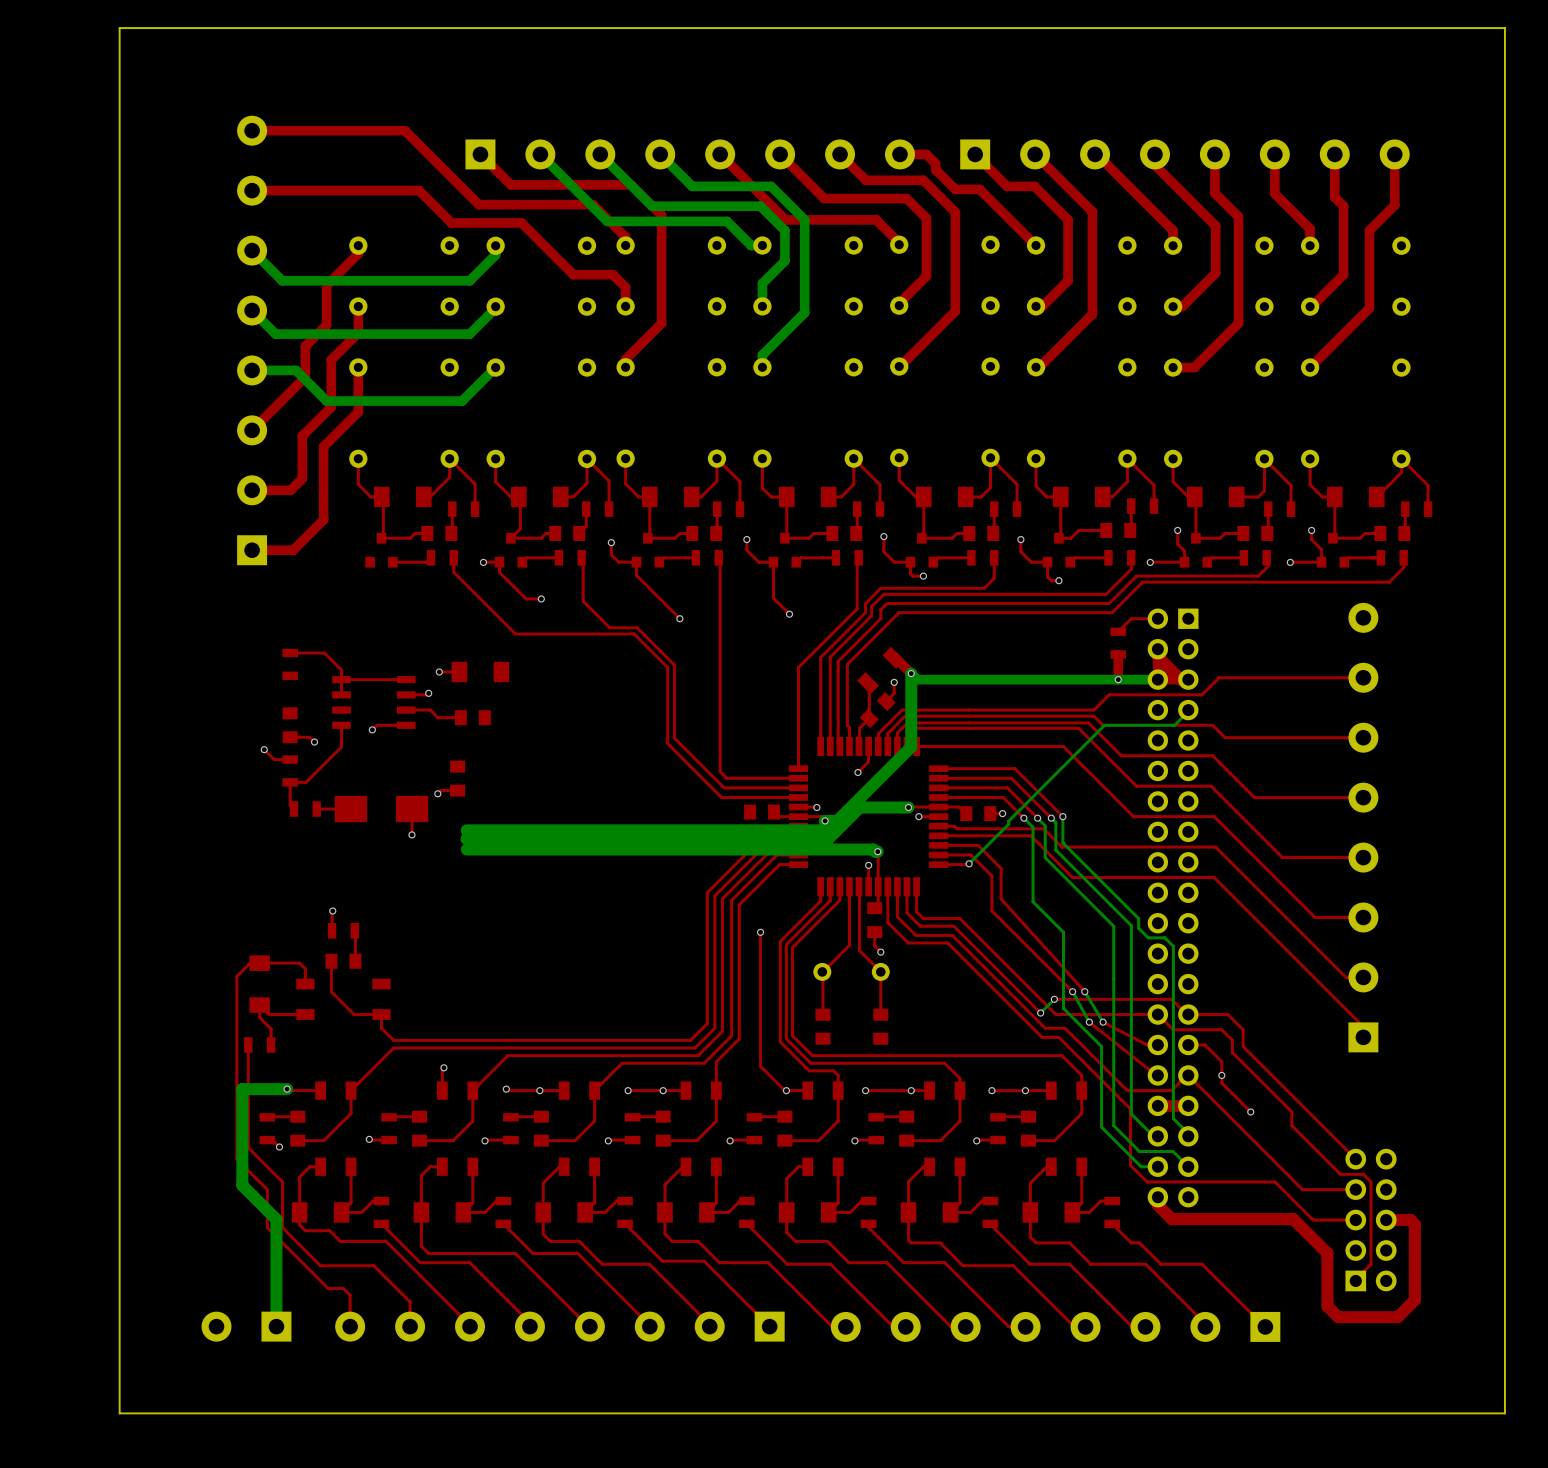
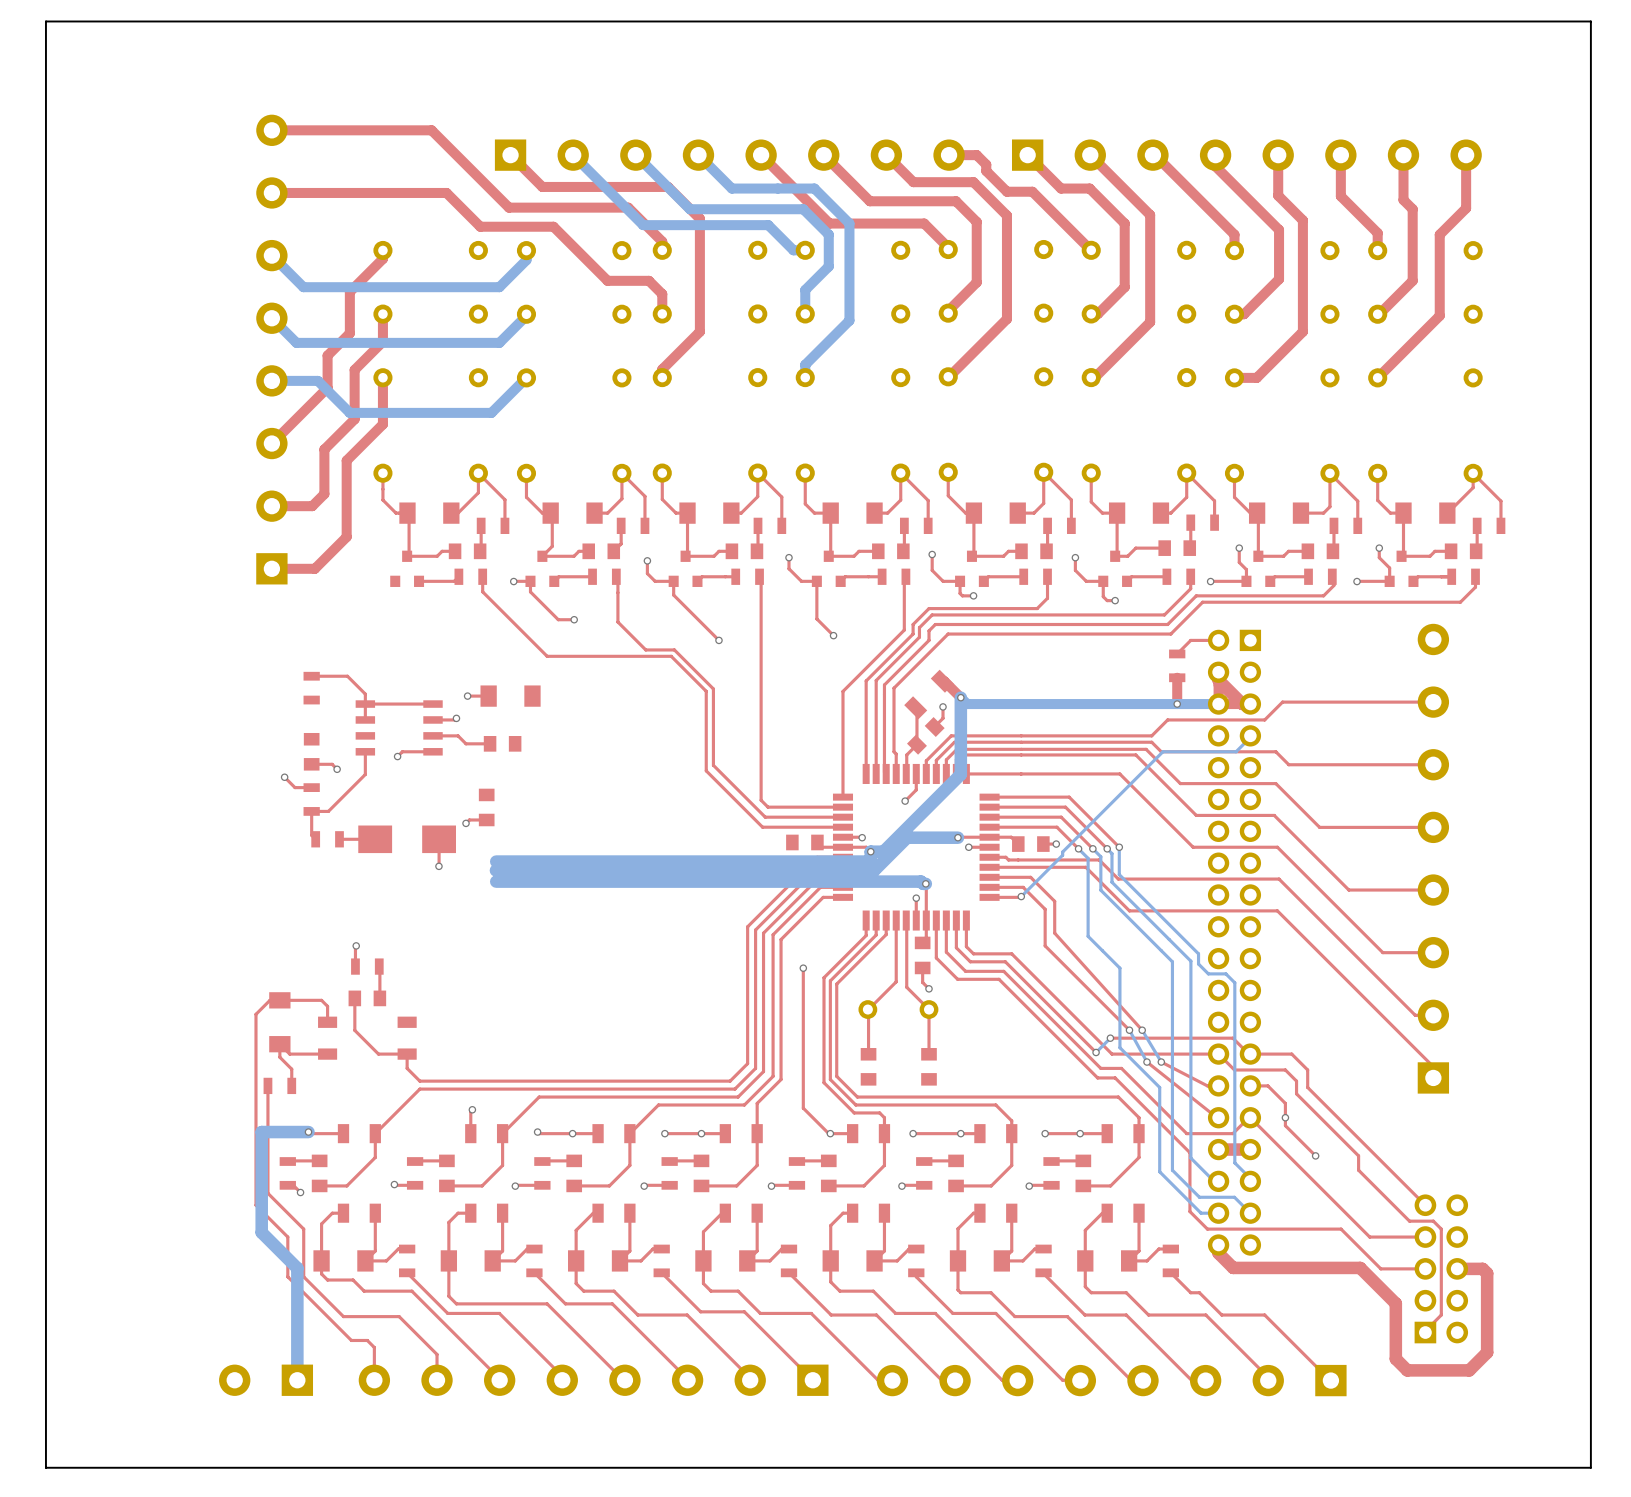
board edge: (1504, 28) (1504, 1413) (119, 1413) (119, 28) (1504, 28) -> (1590, 21) (1590, 1467) (45, 1467) (45, 21) (1590, 21)

